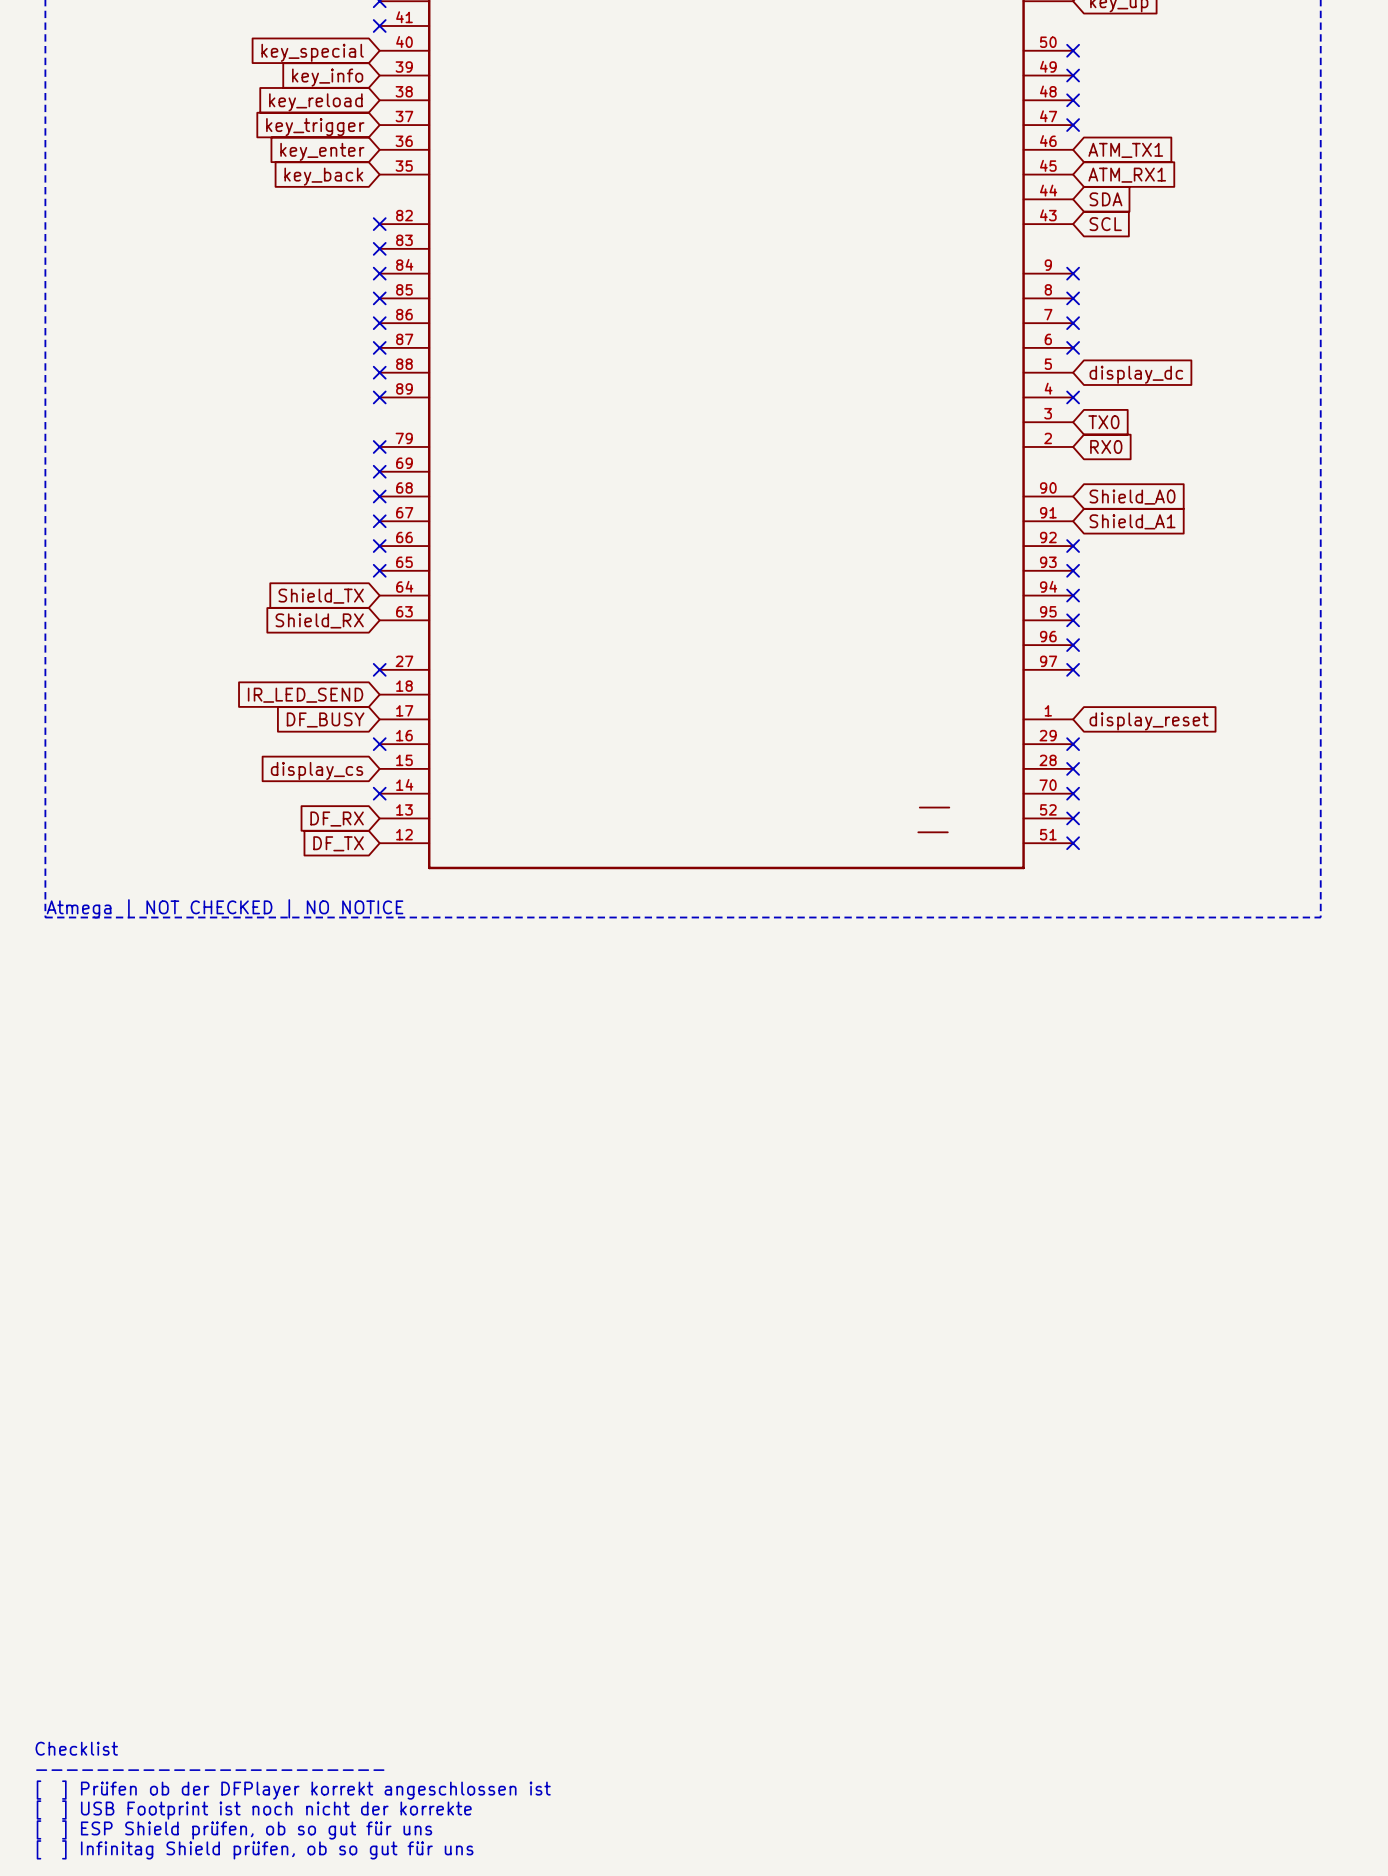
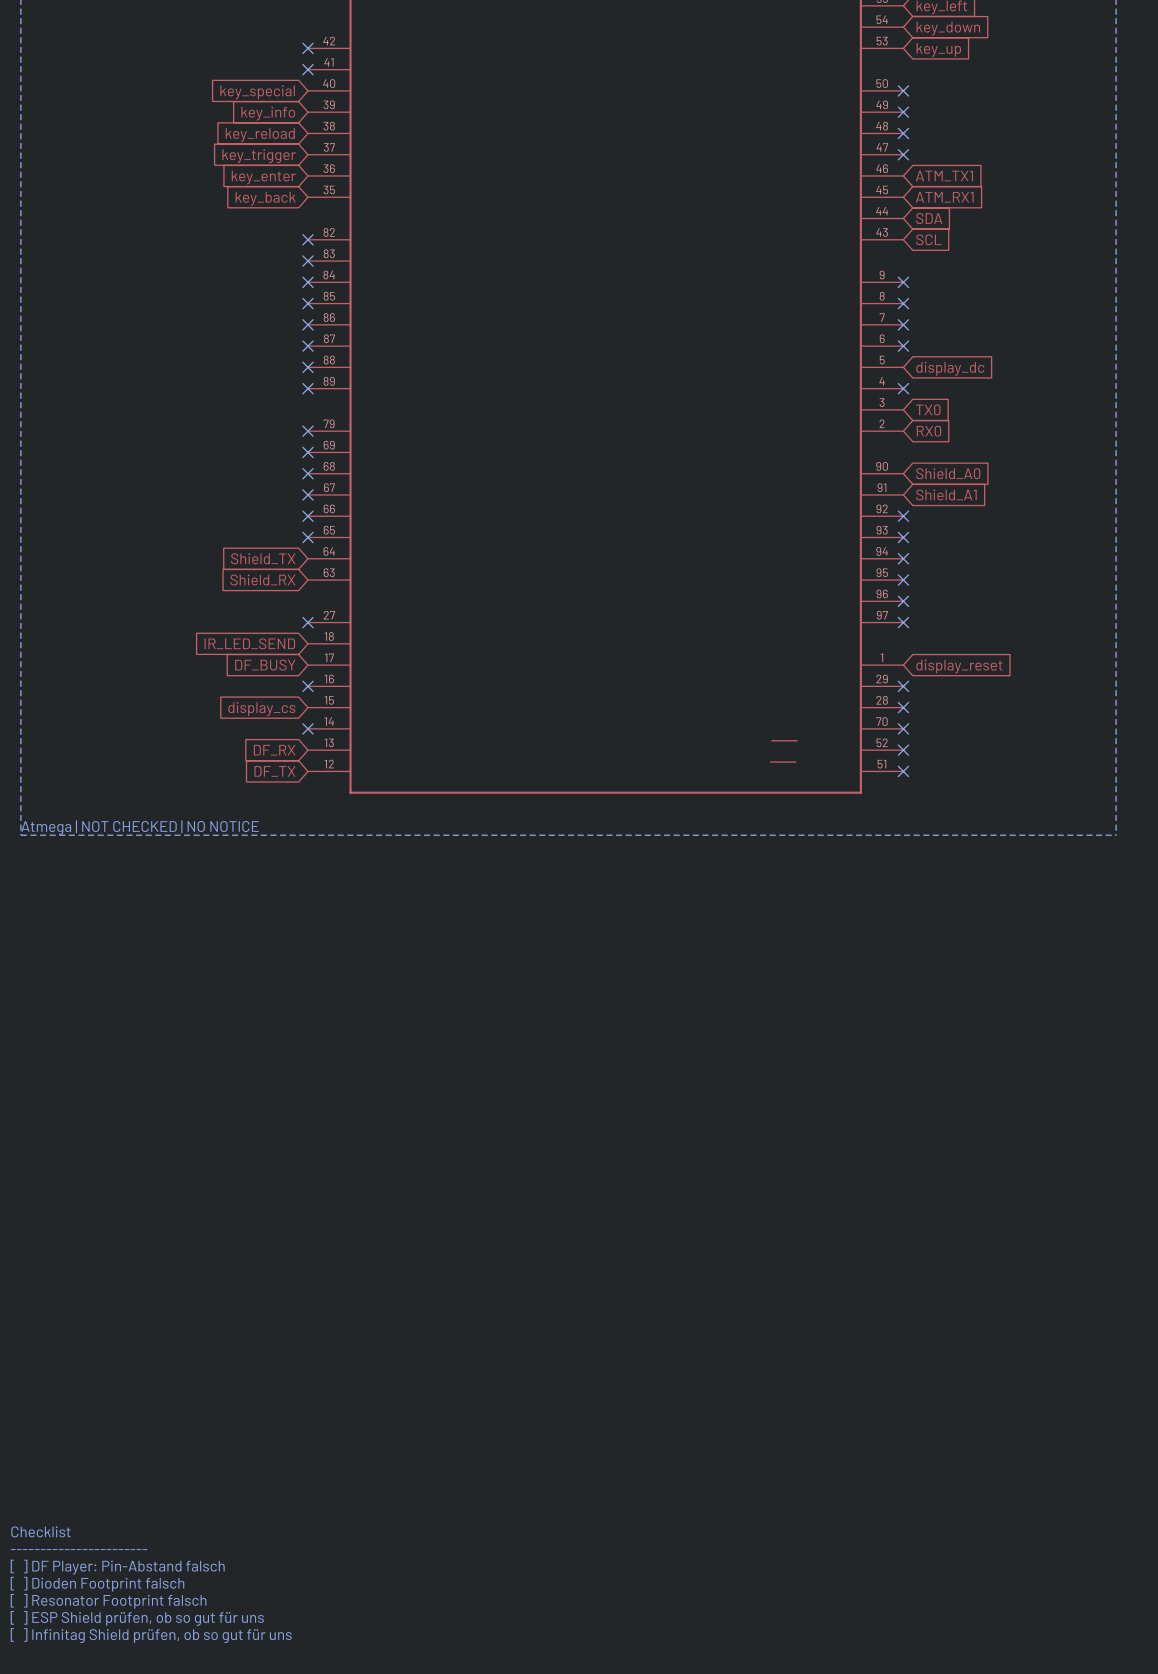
text: none -> Checklist (40, 1531)
text: Checklist (76, 1748) -> ----------------------- (79, 1549)
text: ----------------------- (210, 1770) -> [ ] DF Player: Pin-Abstand falsch (117, 1567)
text: [ ] Prüfen ob der DFPlayer korrekt angeschlossen ist (293, 1790) -> [ ] Dioden Footprint falsch (97, 1584)
text: [ ] USB Footprint ist noch nicht der korrekte (254, 1809) -> [ ] Resonator Footprint falsch (108, 1601)

